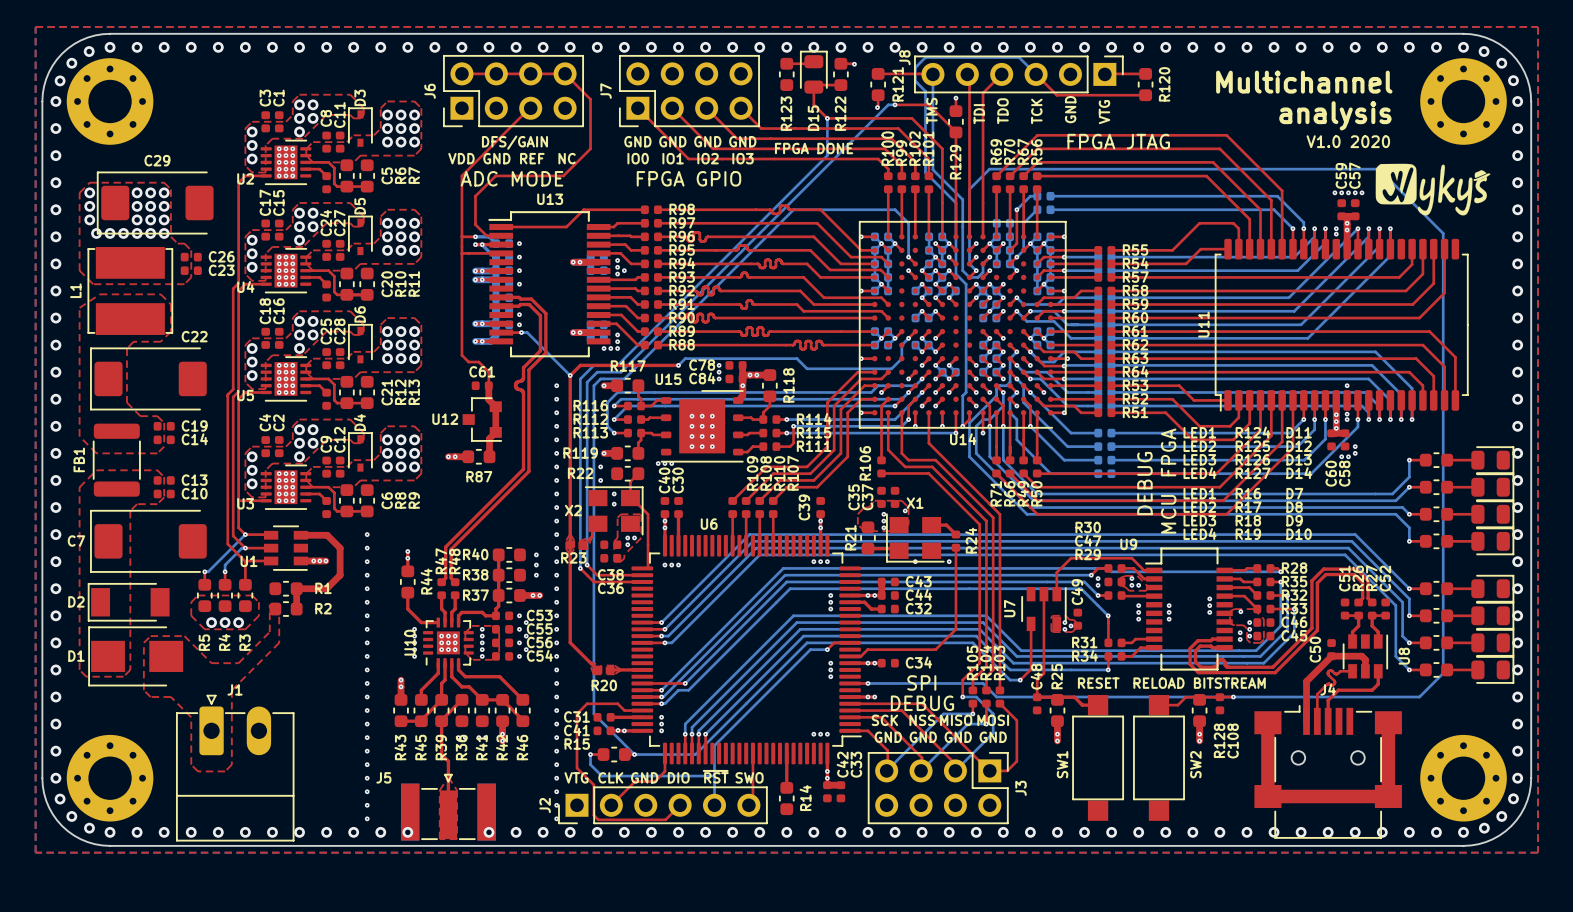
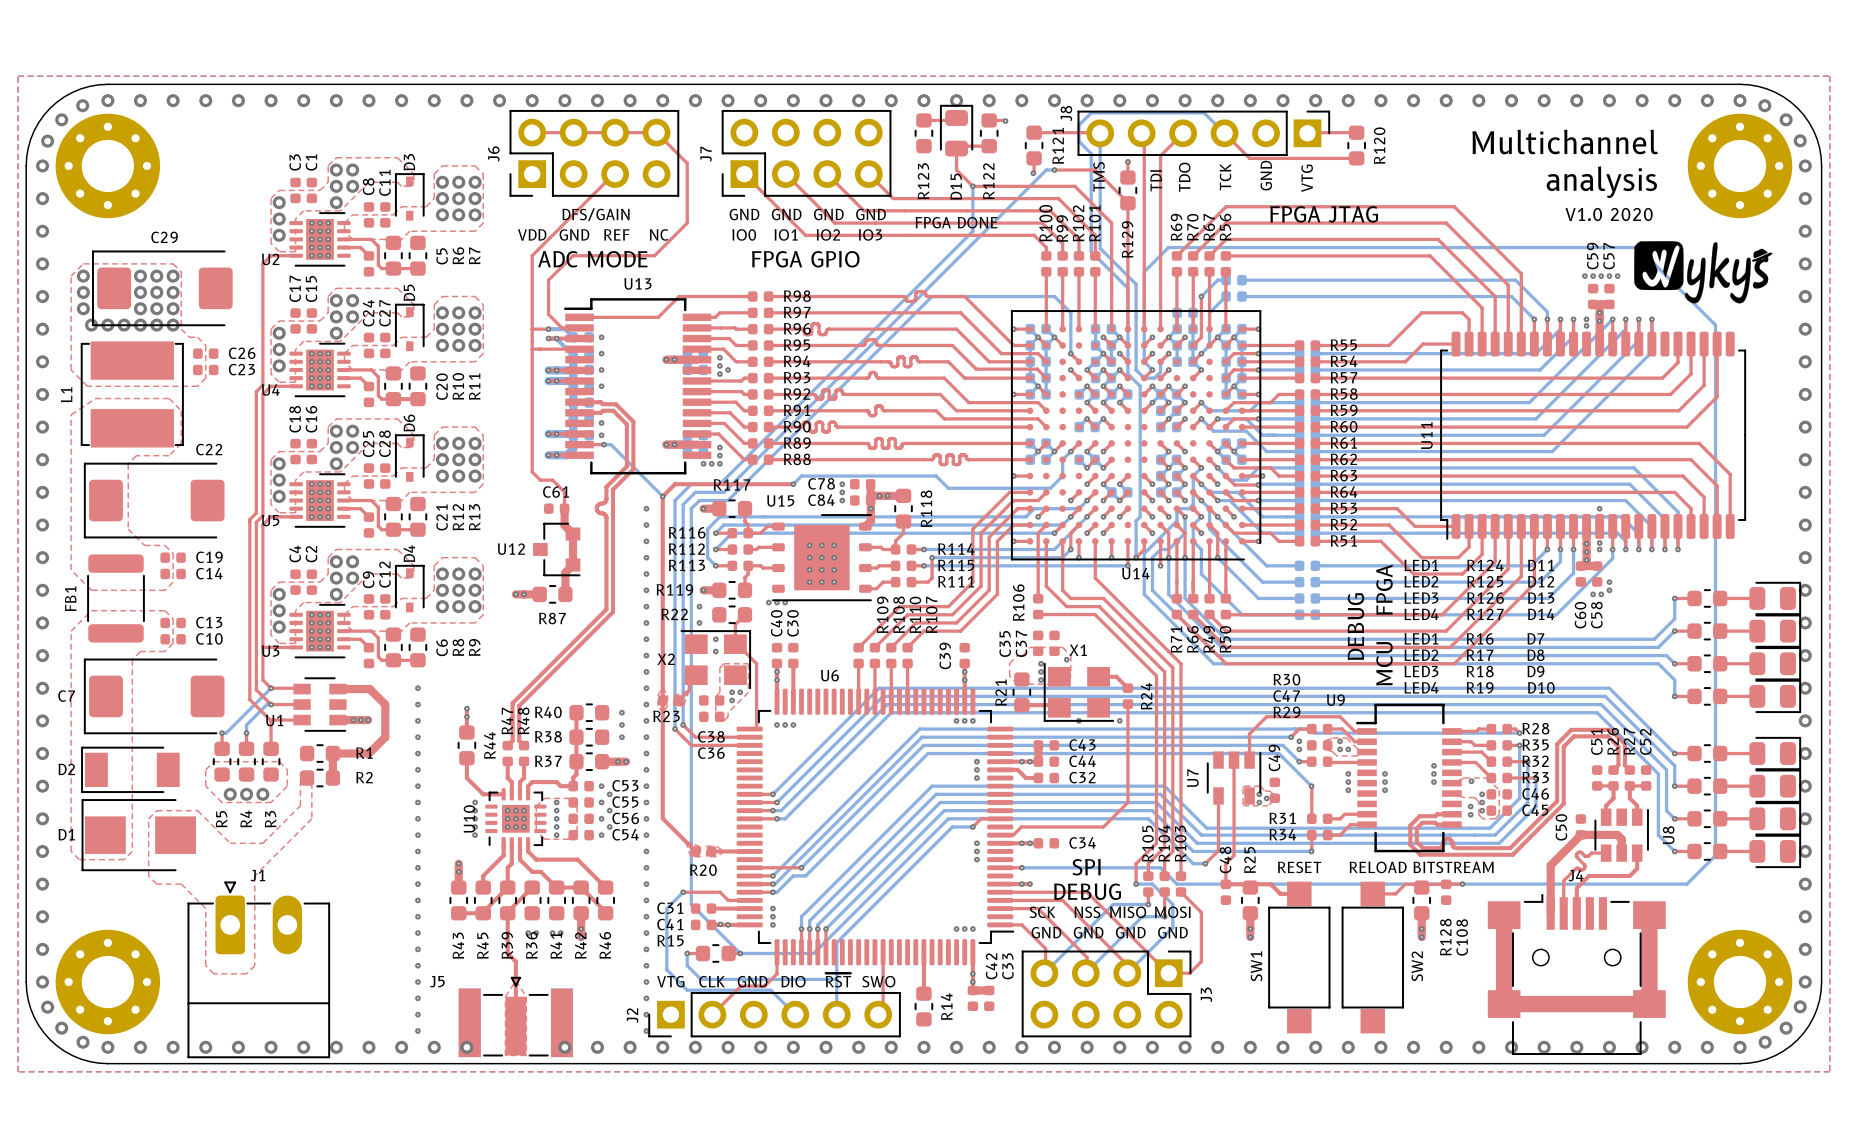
bottom track: none -> (683, 892) (666, 908) (666, 969) (687, 990) (770, 990) (795, 1014)
top track: (587, 703) (576, 713) (576, 768) (593, 784) (593, 815) (598, 819) (665, 819) (680, 805) -> none
via: none -> (683, 892)

